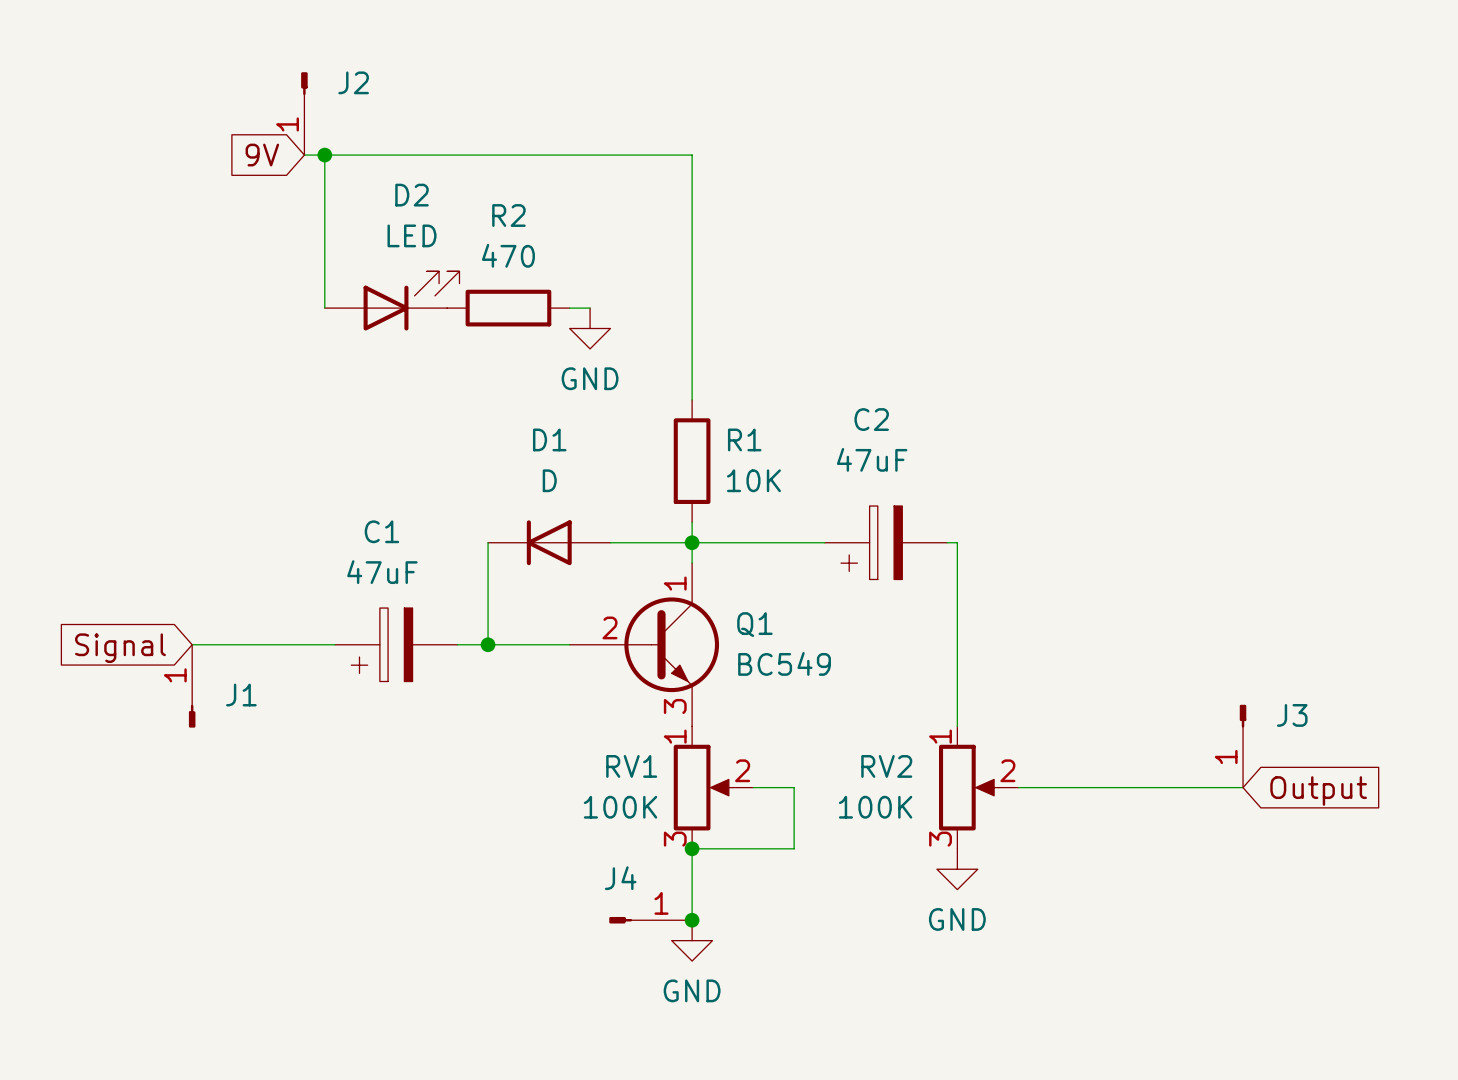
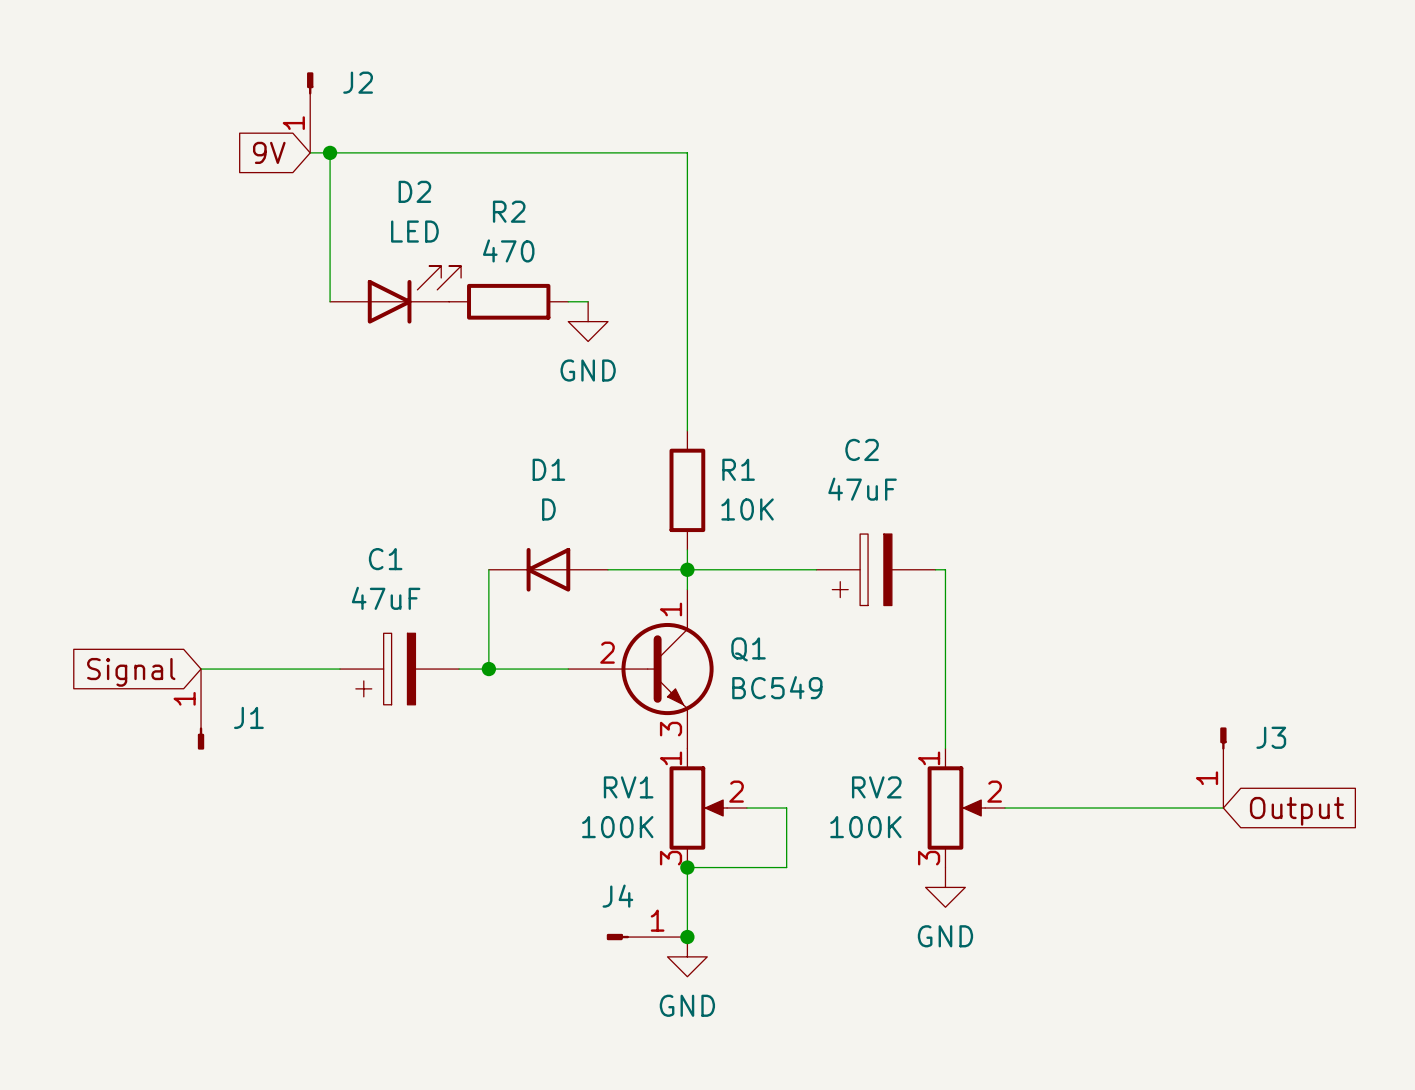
J2 position: (304, 113) -> (310, 112)
global label position: 9V (262, 155) -> 9V (269, 152)
wire: (304, 155) (692, 155) -> (310, 152) (687, 152) (687, 192)
junction position: (324, 155) -> (330, 152)
wire: (324, 267) (324, 308) -> (330, 152) (330, 192)
D2 position: (392, 300) -> (395, 294)
R2 position: (508, 308) -> (508, 301)
wire: (569, 308) (590, 308) -> (568, 301) (588, 301)
power symbol position: GND (590, 328) -> GND (588, 321)

